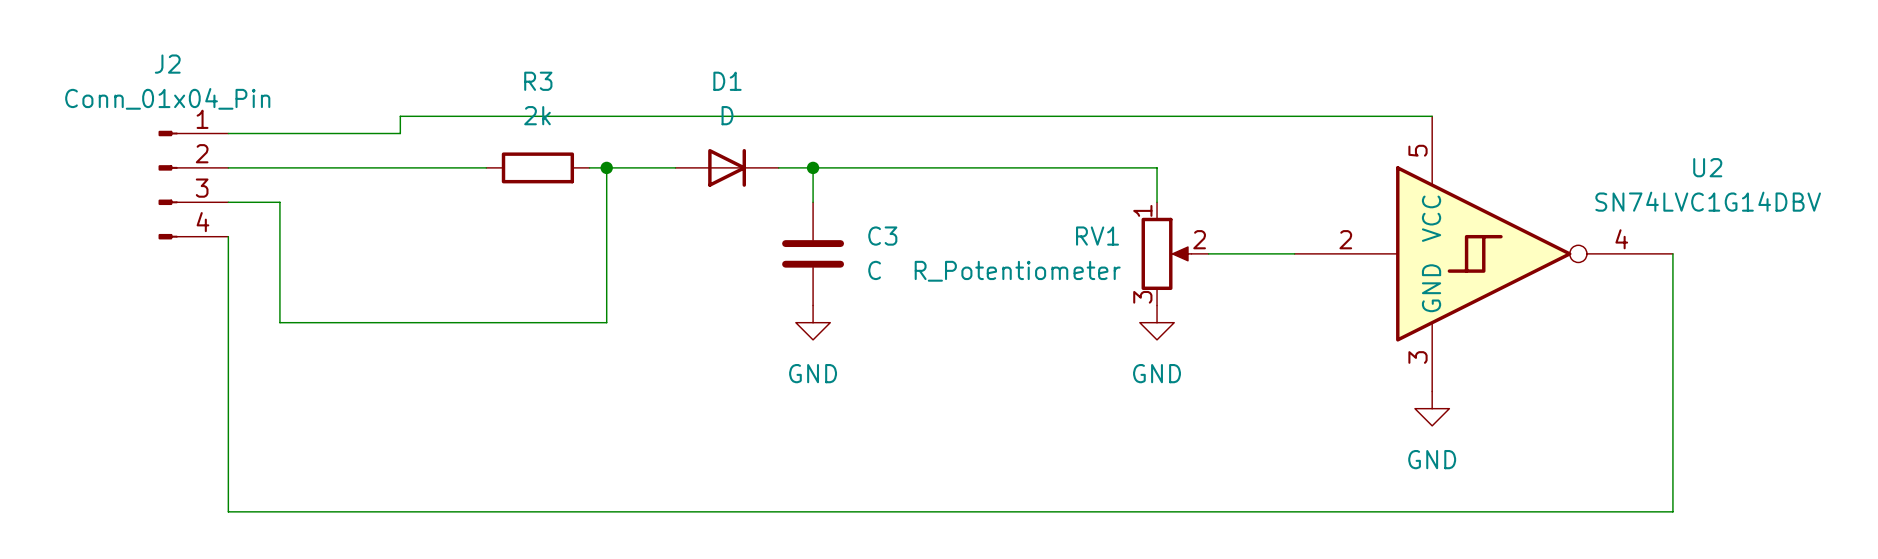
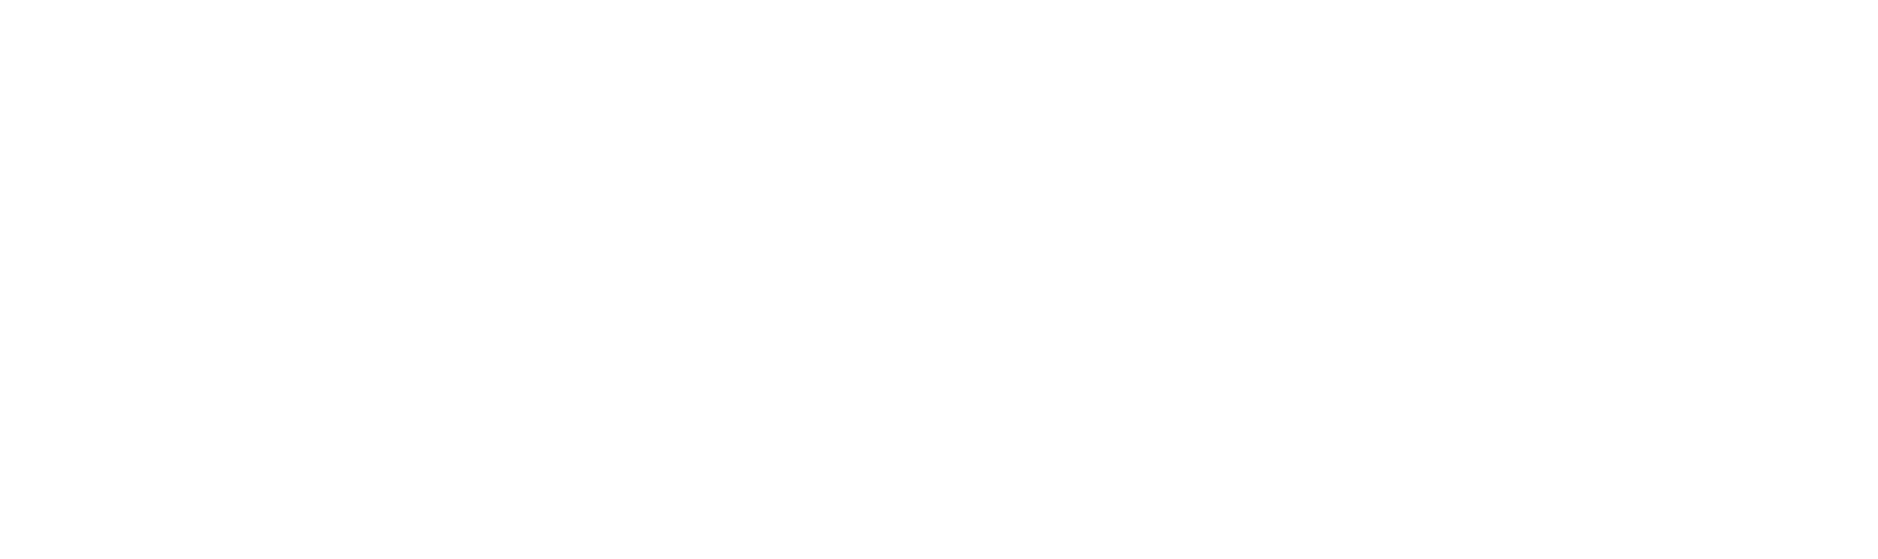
wire: (1432, 116) (400, 116) (400, 133) (228, 133) -> none
wire: (228, 167) (486, 167) -> none
R3: 2k (537, 167) -> none
wire: (589, 167) (675, 167) -> none
wire: (606, 167) (606, 322) (279, 322) (279, 202) (228, 202) -> none
junction: (606, 167) -> none
D1: D (727, 167) -> none
wire: (778, 167) (1157, 167) (1157, 202) -> none
wire: (813, 167) (813, 202) -> none
junction: (813, 167) -> none
J2: Conn_01x04_Pin (193, 185) -> none
wire: (228, 236) (228, 511) (1672, 511) (1672, 253) -> none
C3: C (813, 253) -> none
RV1: R_Potentiometer (1175, 253) -> none
wire: (1208, 253) (1294, 253) -> none
U2: SN74LVC1G14DBV (1483, 253) -> none
power symbol: GND (813, 322) -> none
power symbol: GND (1157, 322) -> none
power symbol: GND (1432, 408) -> none

